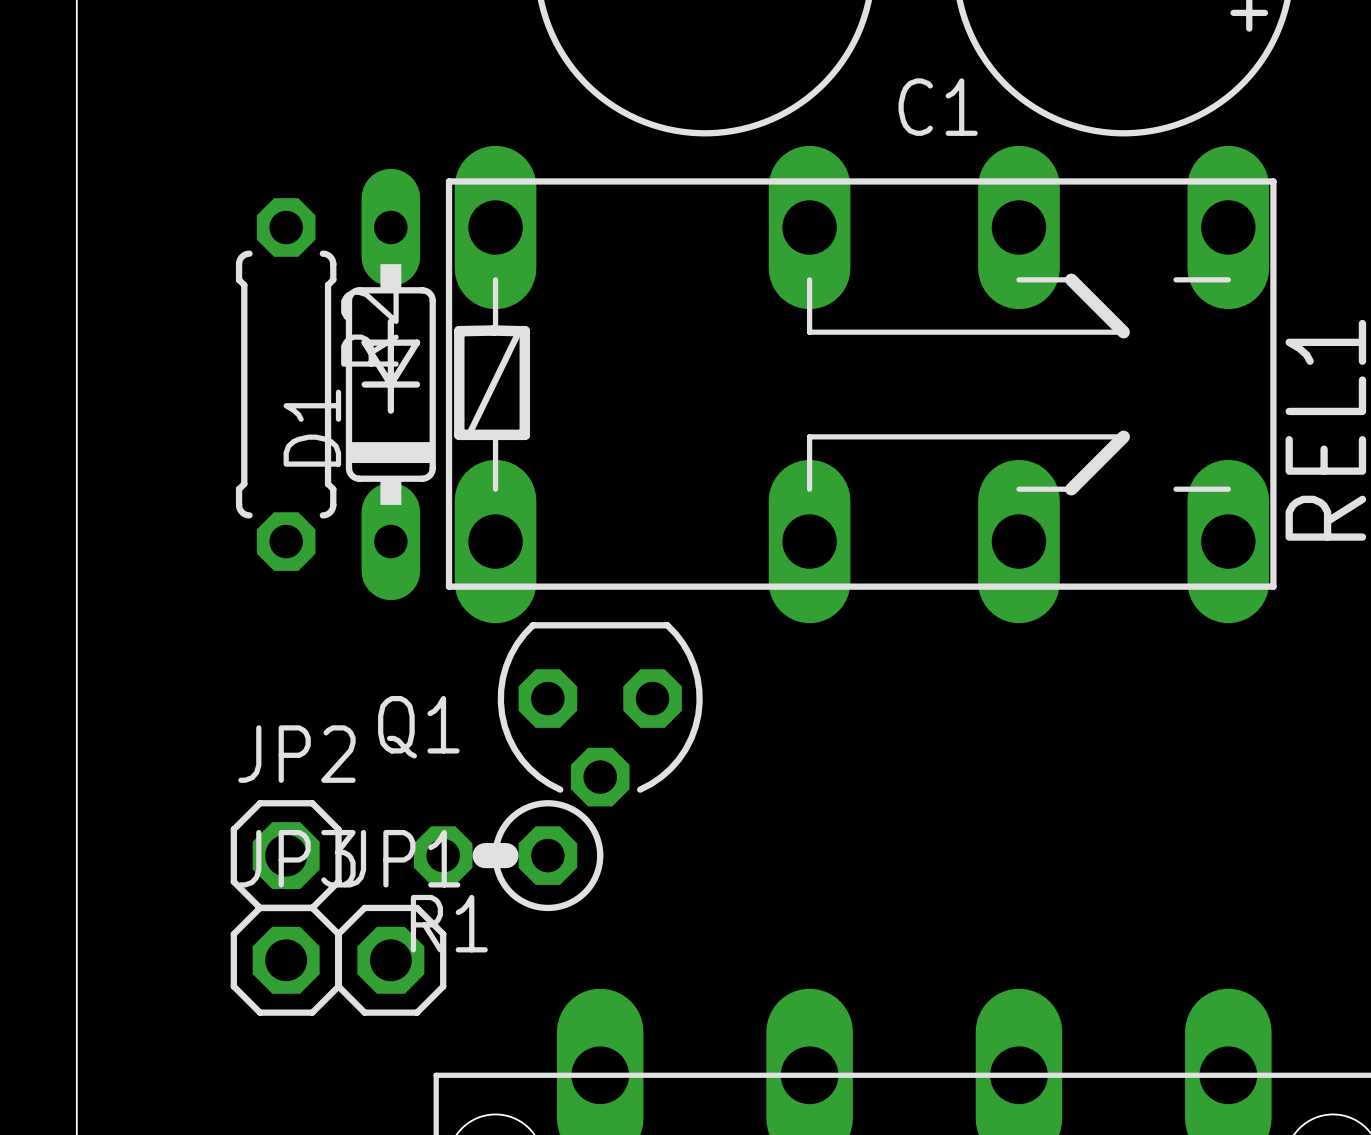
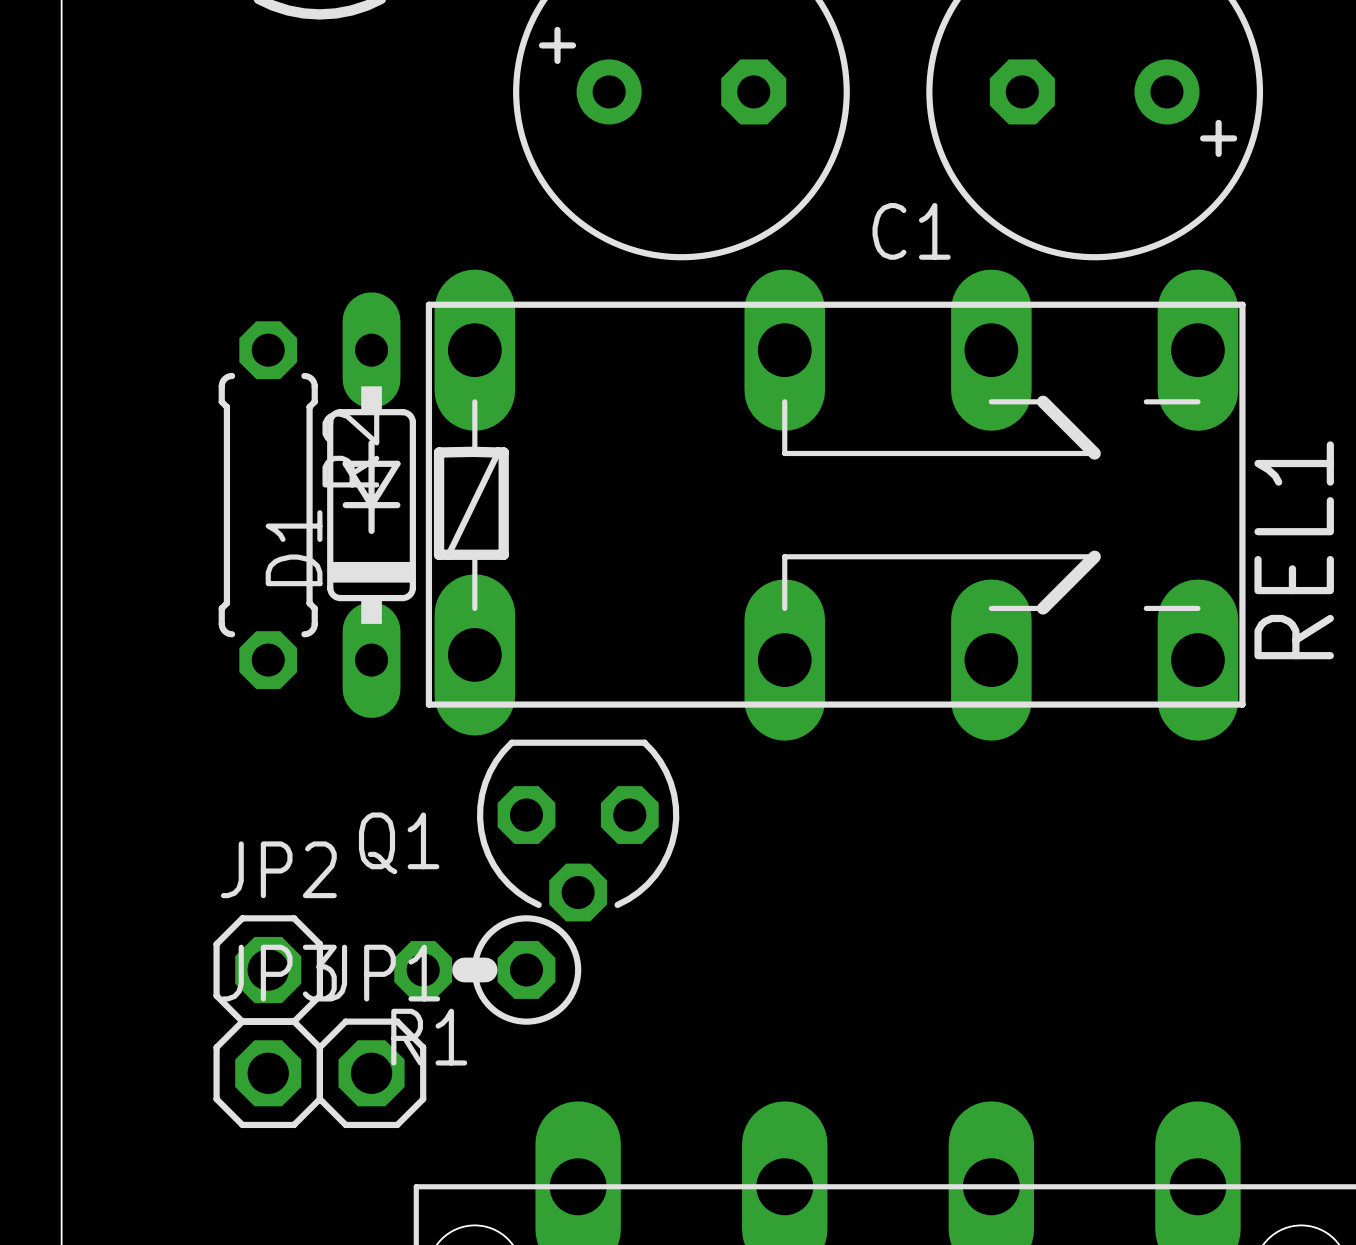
REL1 footprint: [445, 145, 1277, 624] -> [425, 269, 1246, 741]

